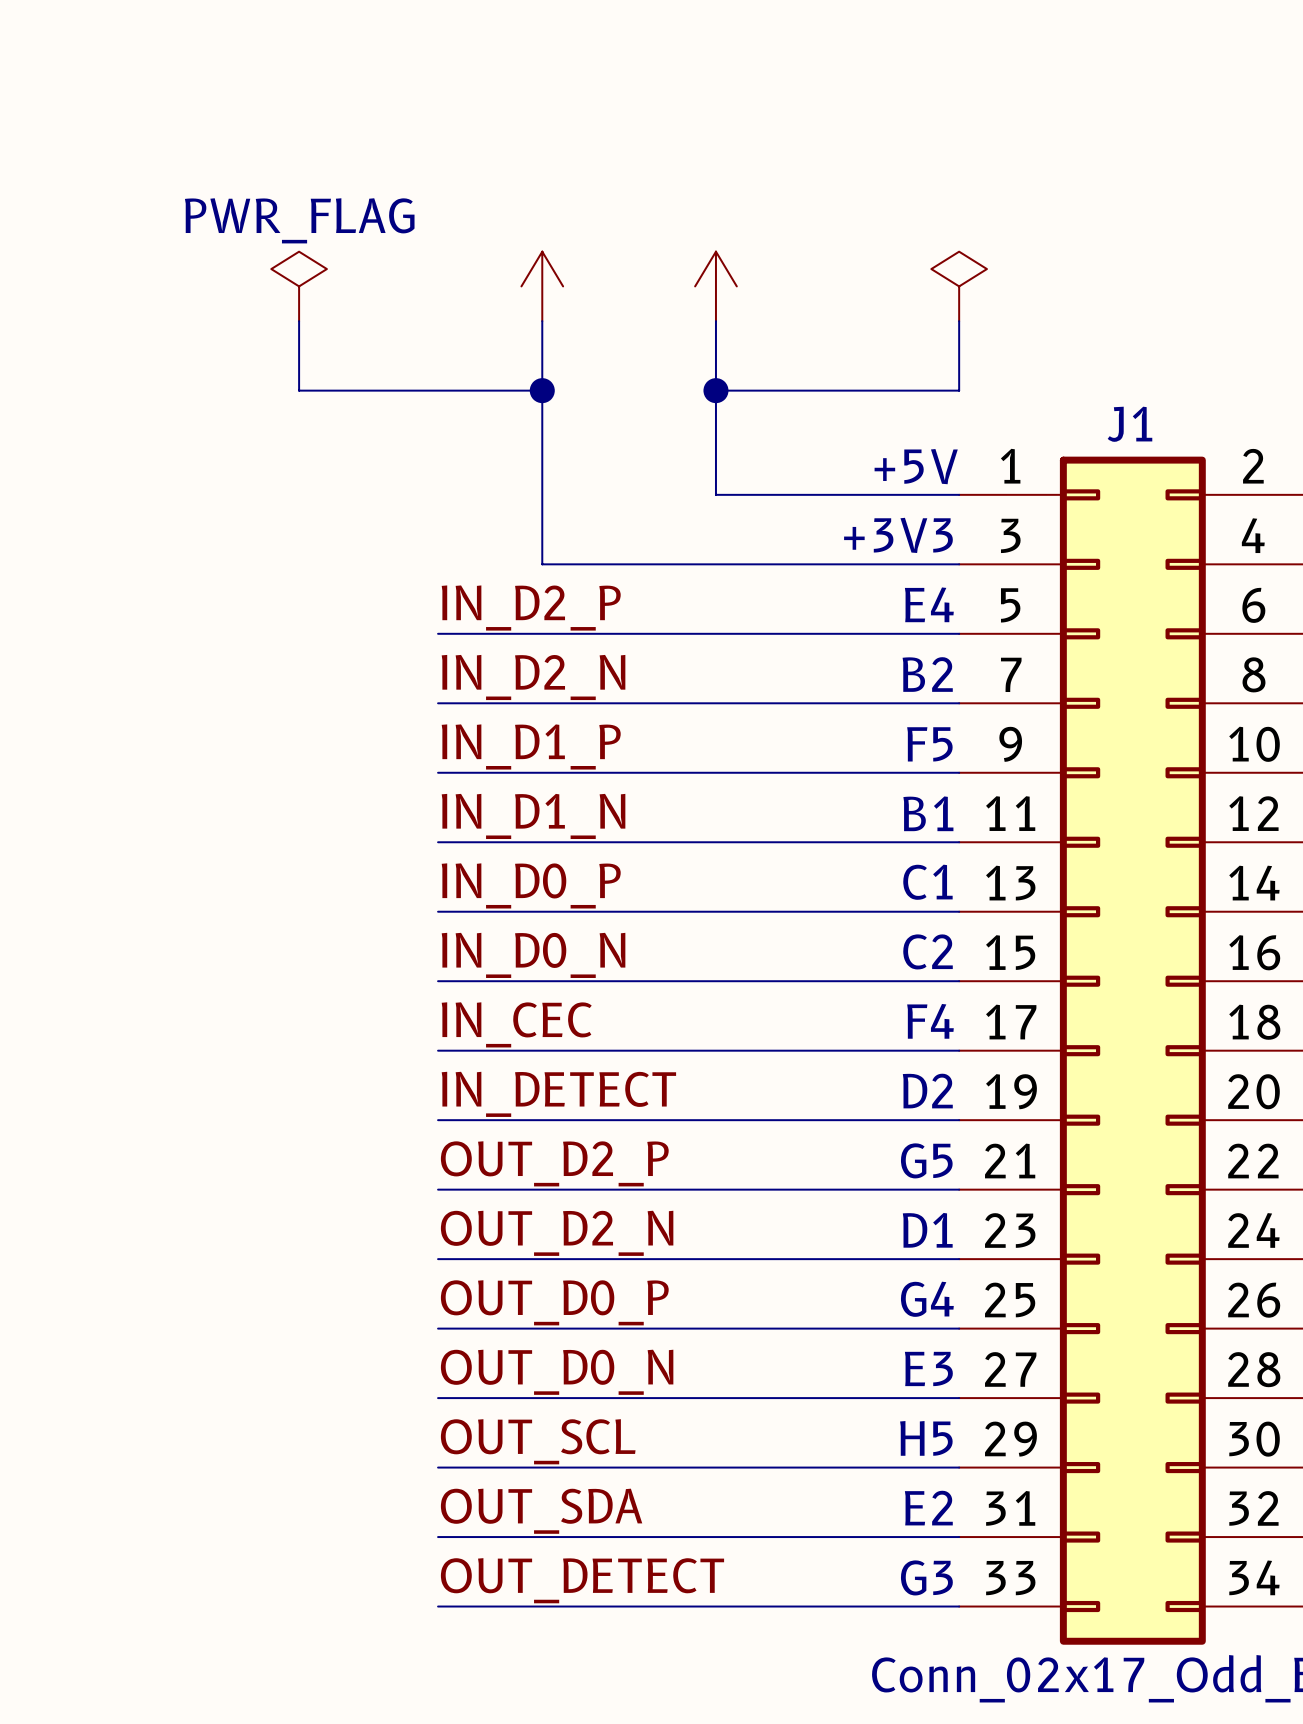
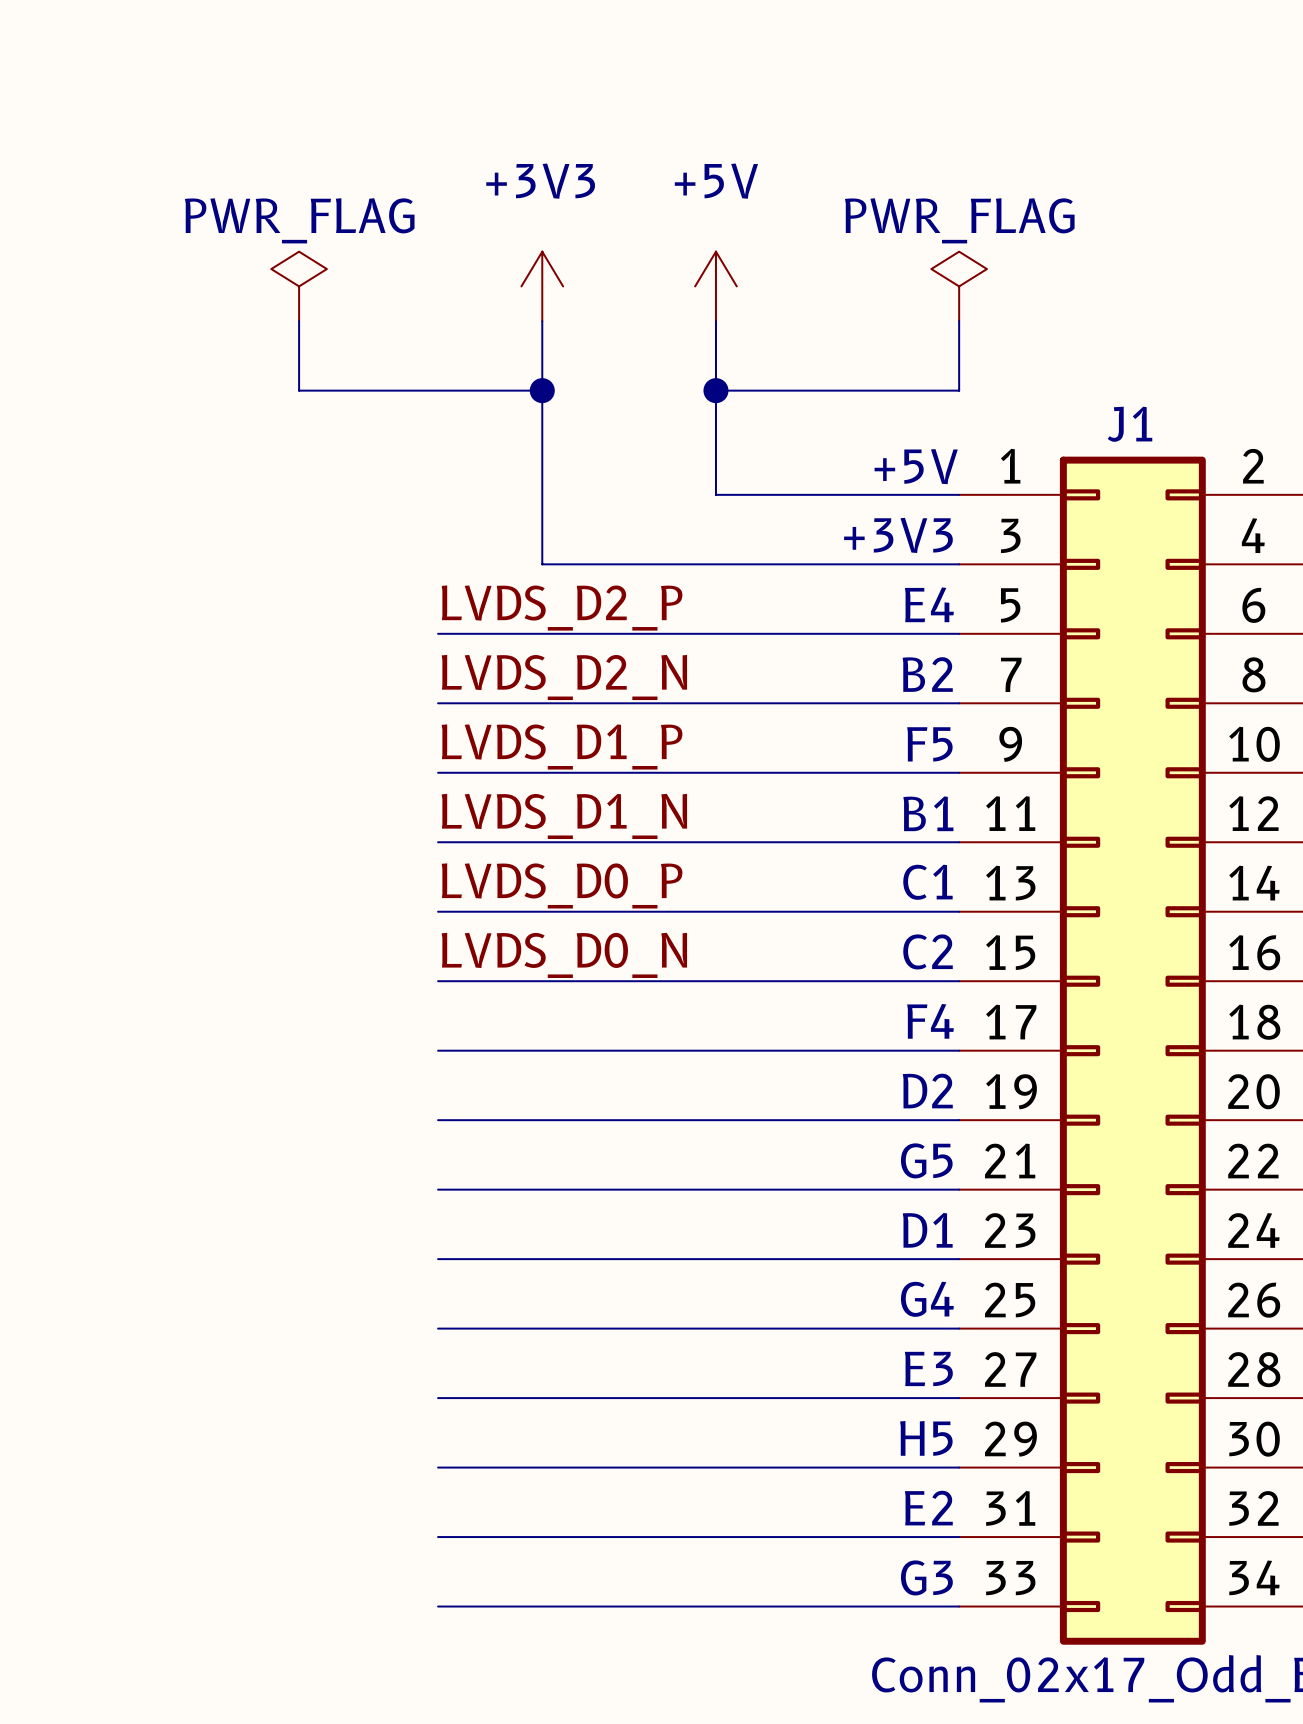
power symbol text: none -> +3V3 (540, 181)
power symbol text: none -> +5V (716, 181)
power symbol text: none -> PWR_FLAG (959, 220)
label: IN_D2_P (531, 608) -> LVDS_D2_P (562, 608)
label: IN_D2_N (533, 677) -> LVDS_D2_N (564, 677)
label: IN_D1_P (531, 746) -> LVDS_D1_P (562, 746)
label: IN_D1_N (533, 816) -> LVDS_D1_N (564, 816)
label: IN_D0_P (531, 885) -> LVDS_D0_P (562, 885)
label: IN_D0_N (533, 955) -> LVDS_D0_N (564, 955)
label: IN_CEC (516, 1024) -> none
label: IN_DETECT (558, 1094) -> none
label: OUT_D2_P (554, 1163) -> none
label: OUT_D2_N (557, 1233) -> none
label: OUT_D0_P (554, 1302) -> none
label: OUT_D0_N (557, 1372) -> none
label: OUT_SCL (538, 1441) -> none
label: OUT_SDA (541, 1511) -> none
label: OUT_DETECT (582, 1580) -> none

